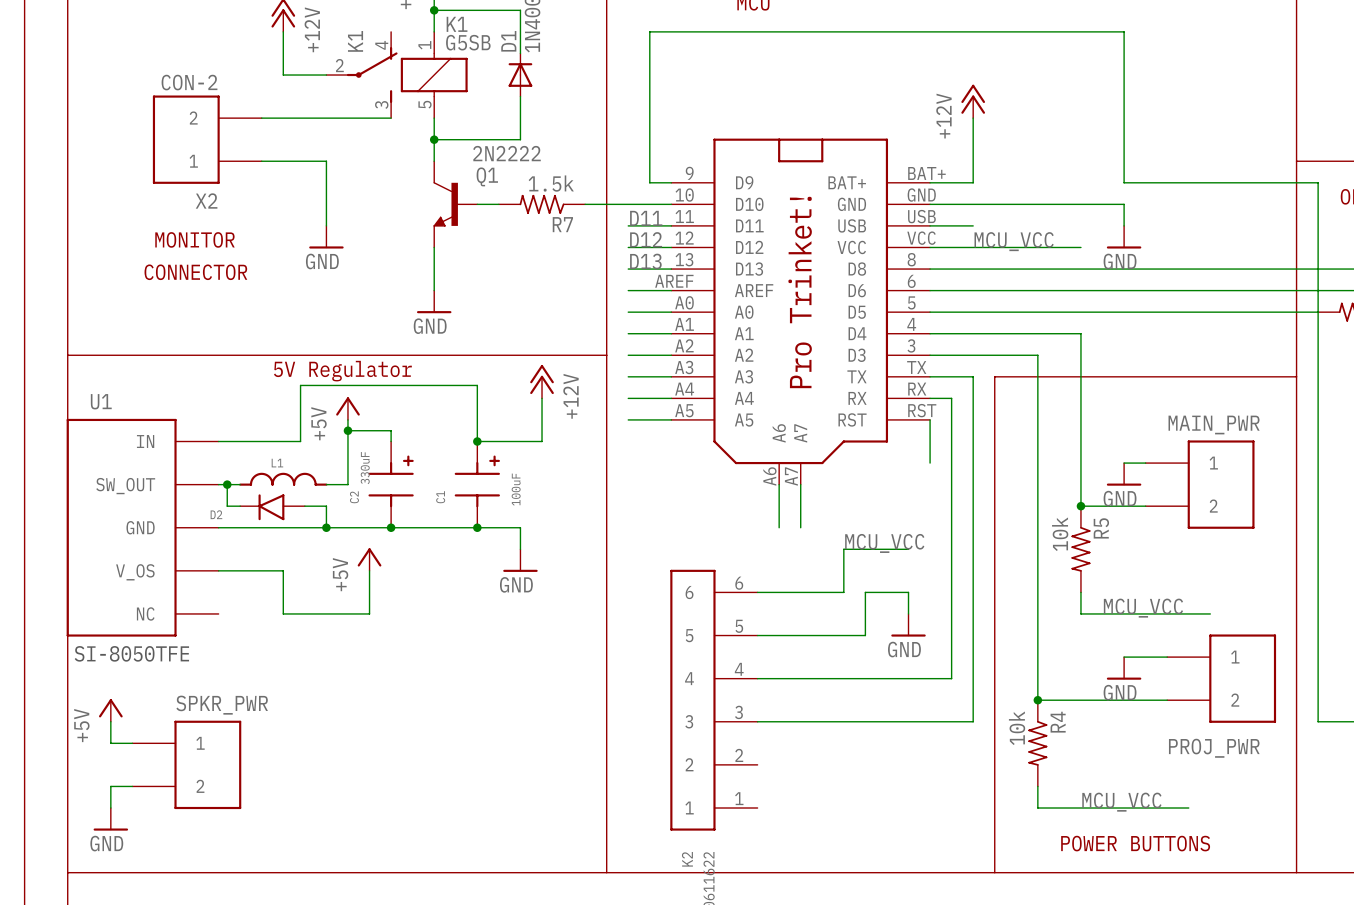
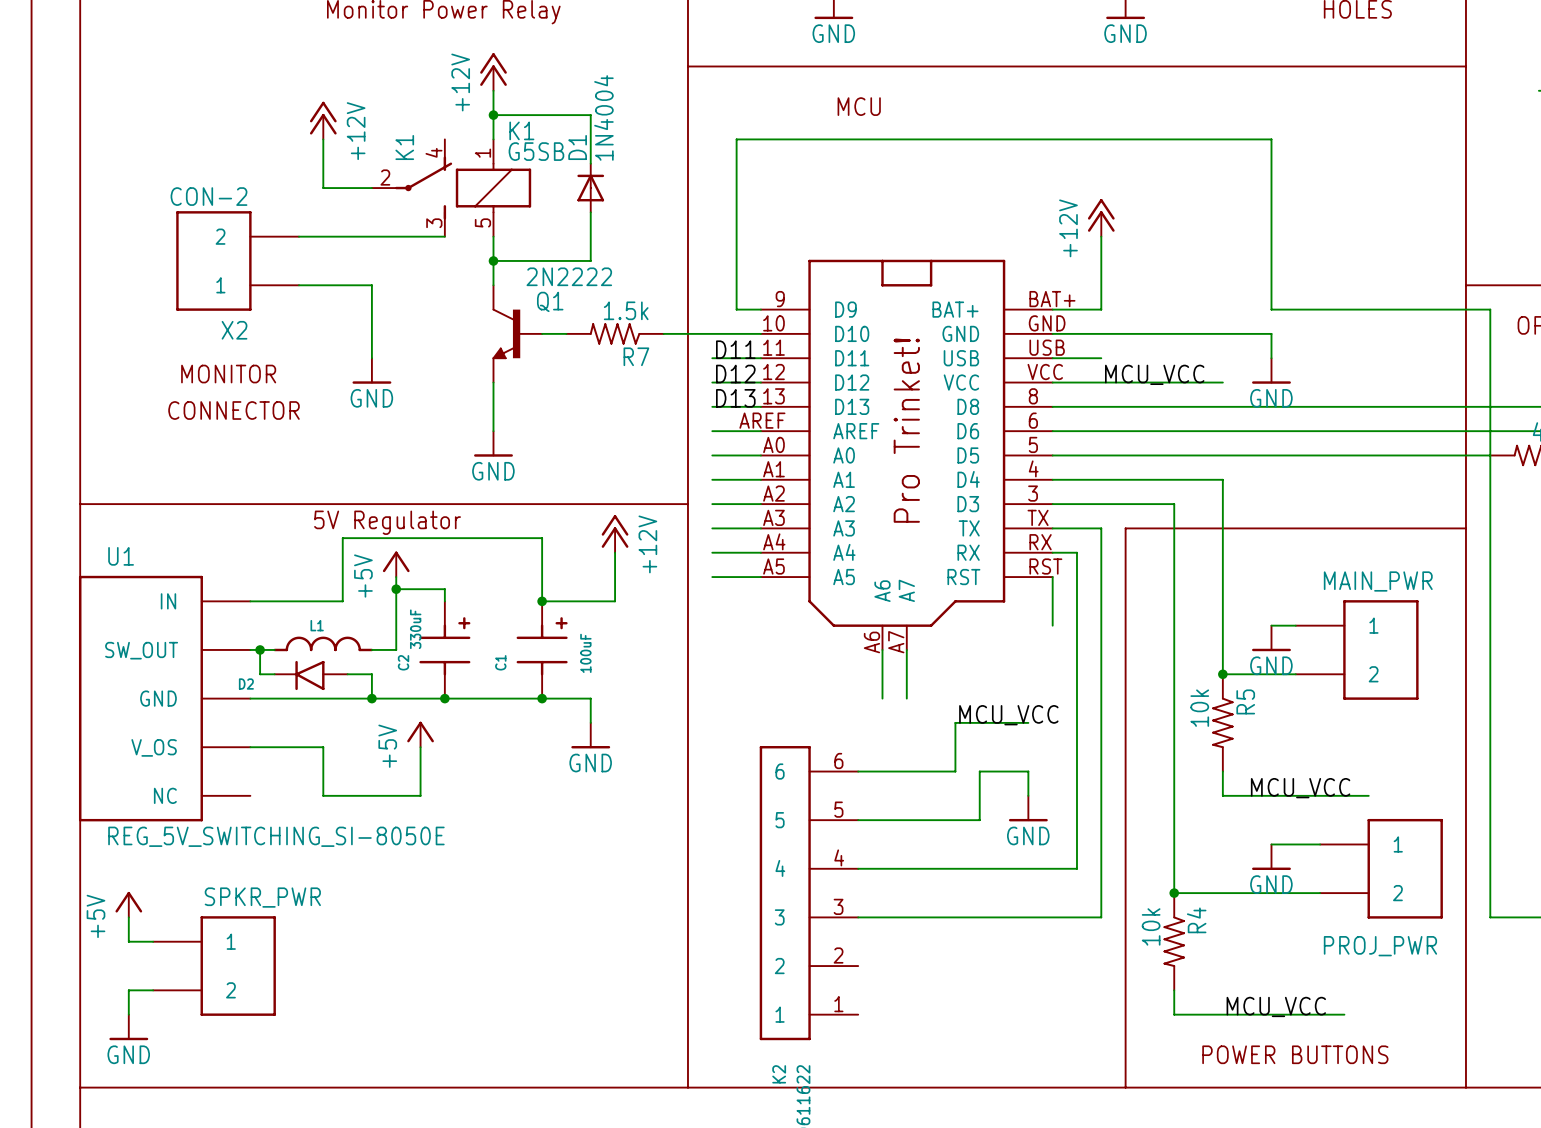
U1 value: none -> REG_5V_SWITCHING_SI-8050E (276, 836)
text: SI-8050TFE (131, 653) -> none

